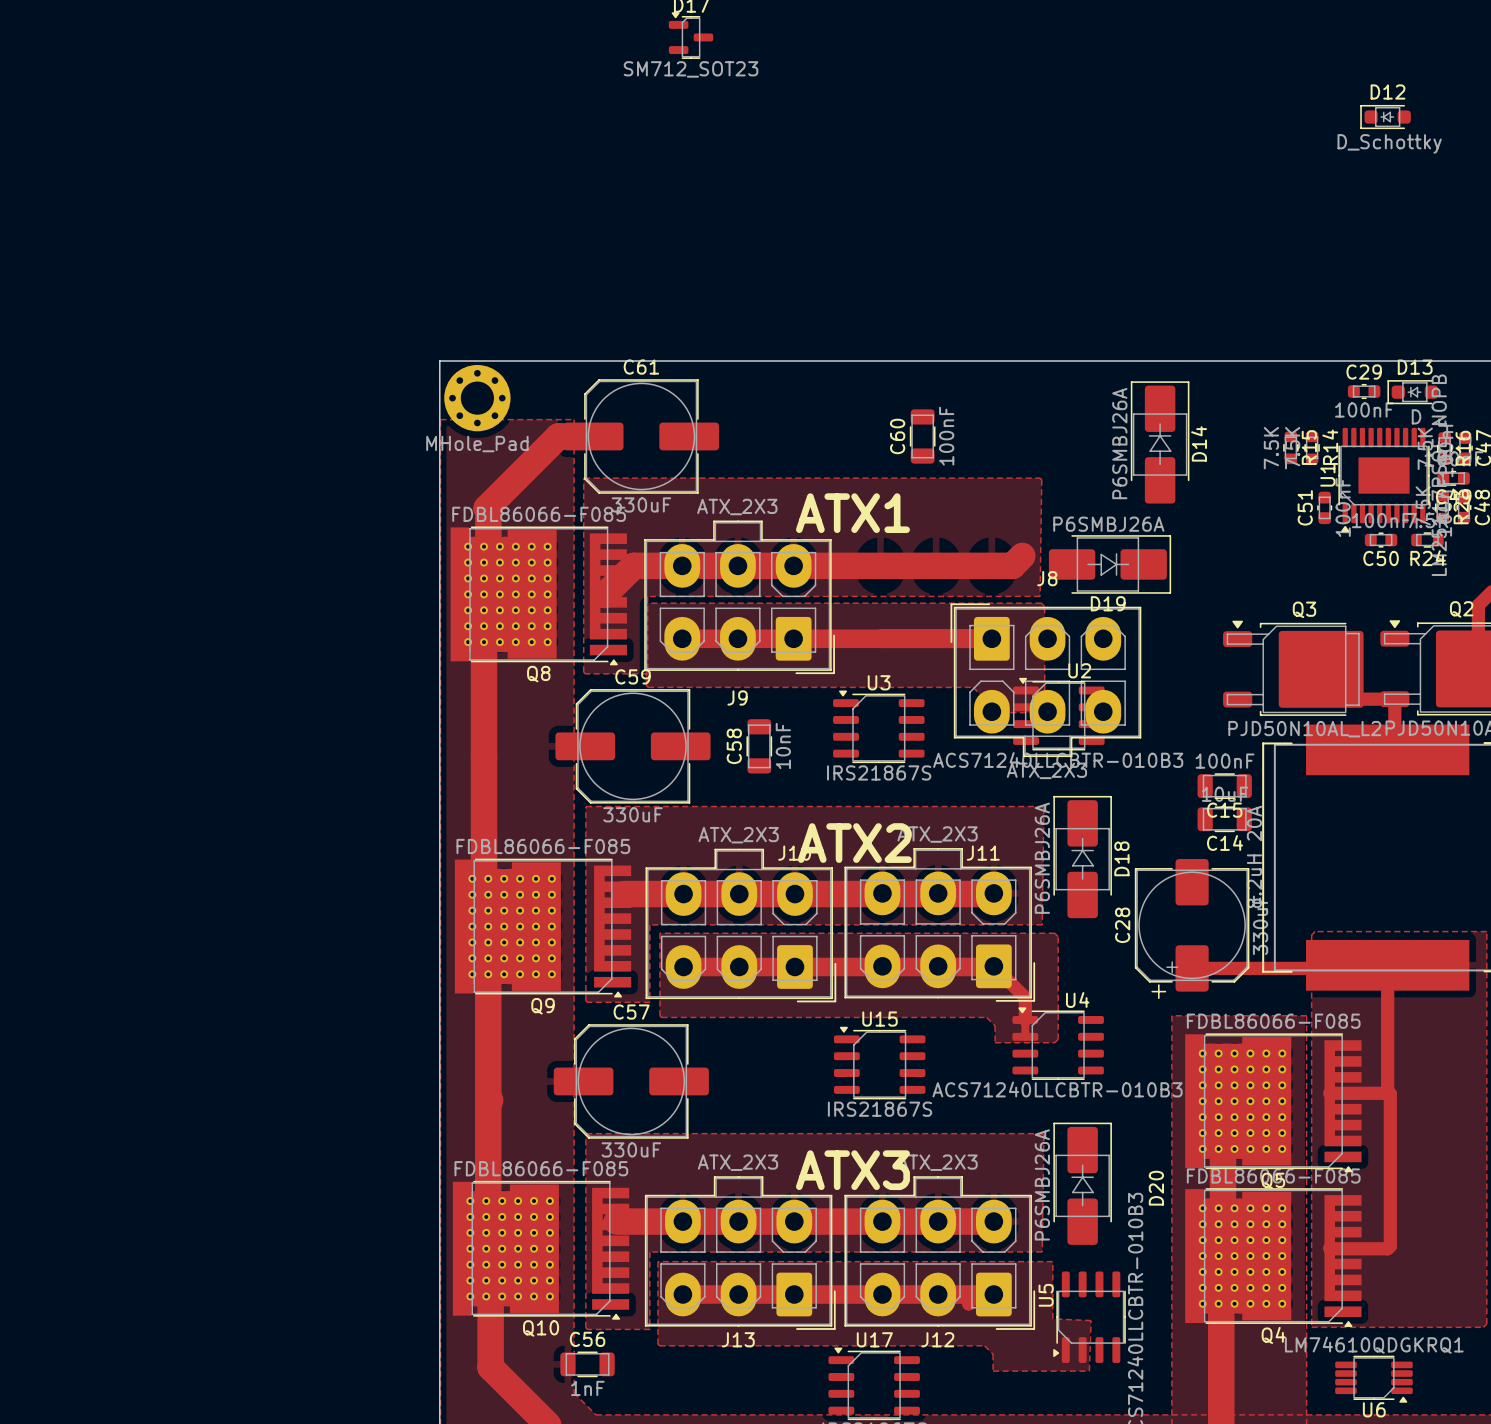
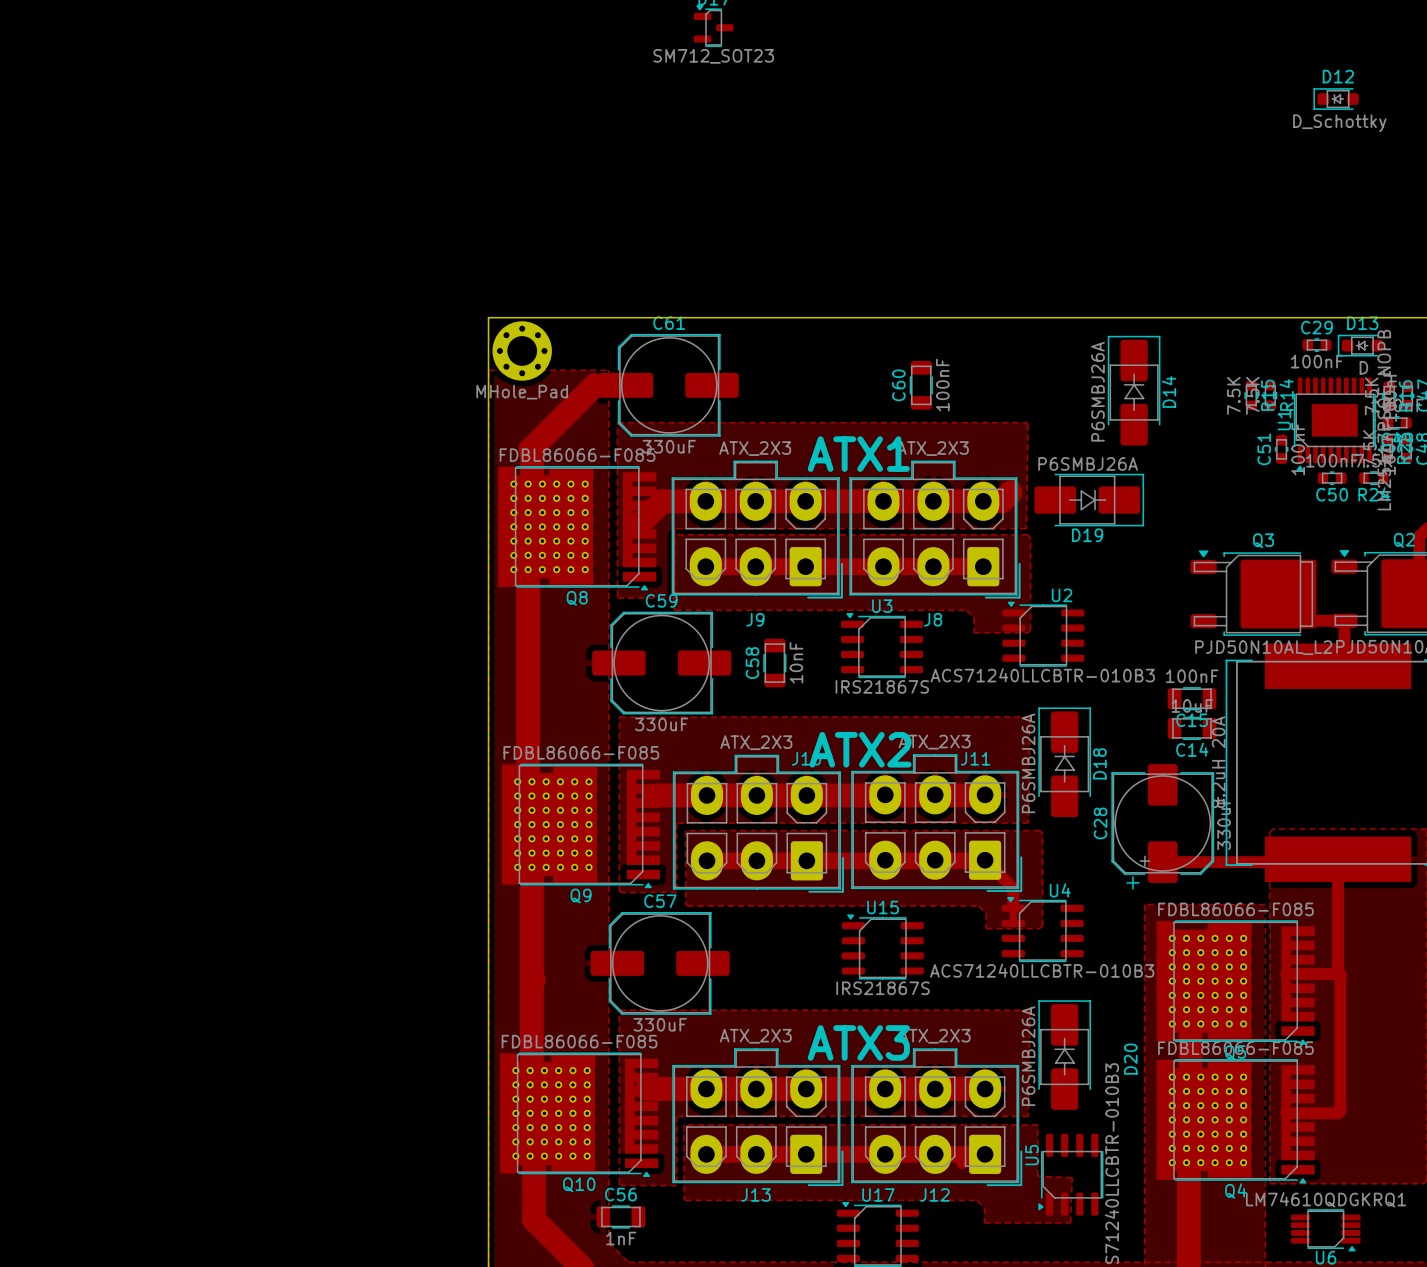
J8 rotation: 0° (1045, 680) -> 180° (934, 529)
J8 position: (1045, 680) -> (934, 529)

